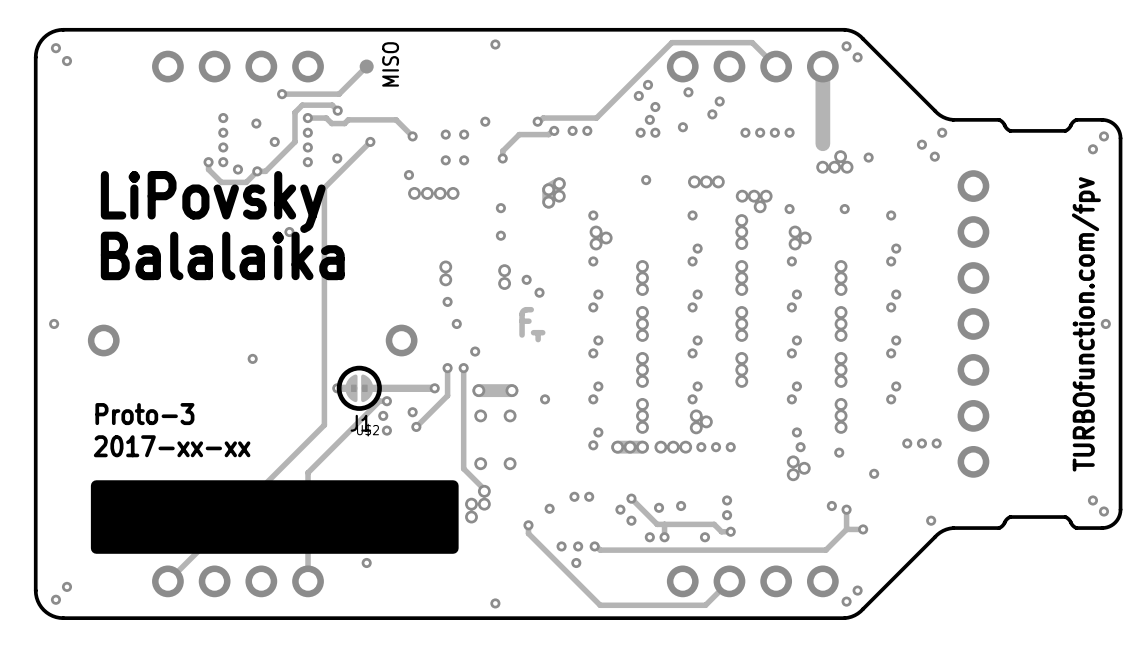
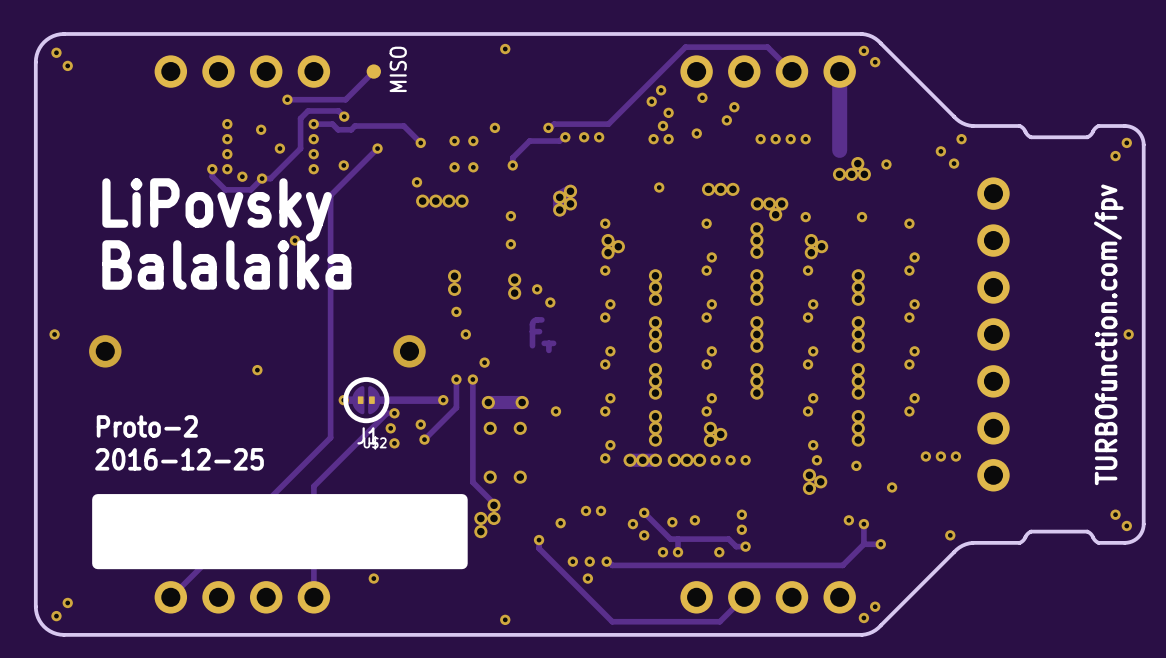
text: Proto-3 (144, 414) -> Proto-2 (147, 426)
text: 2017-xx-xx (172, 446) -> 2016-12-25 (179, 459)

